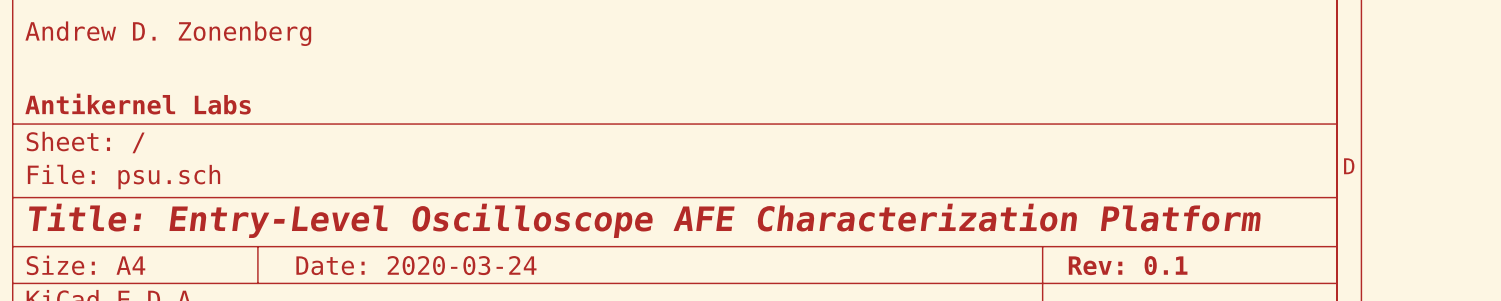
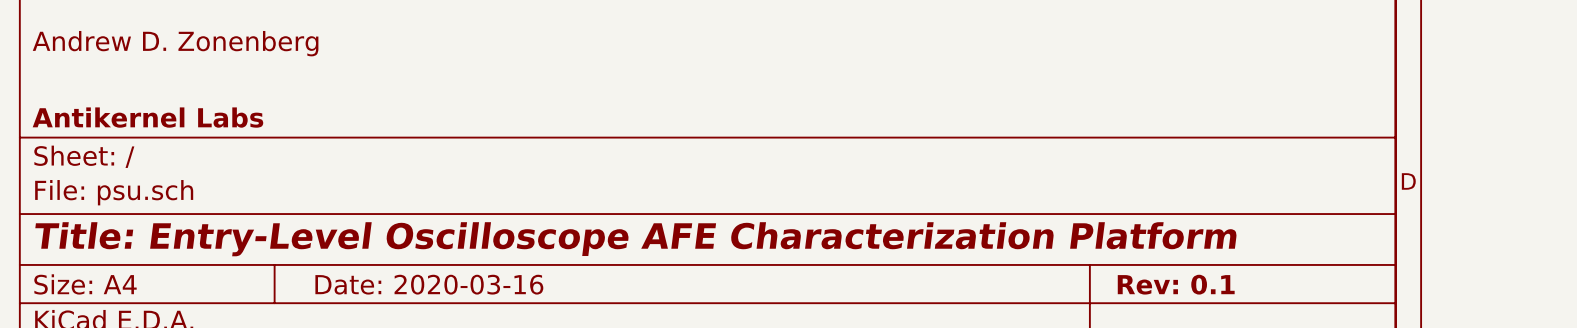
title block: Date: 2020-03-24 (416, 265) -> Date: 2020-03-16 (429, 284)

